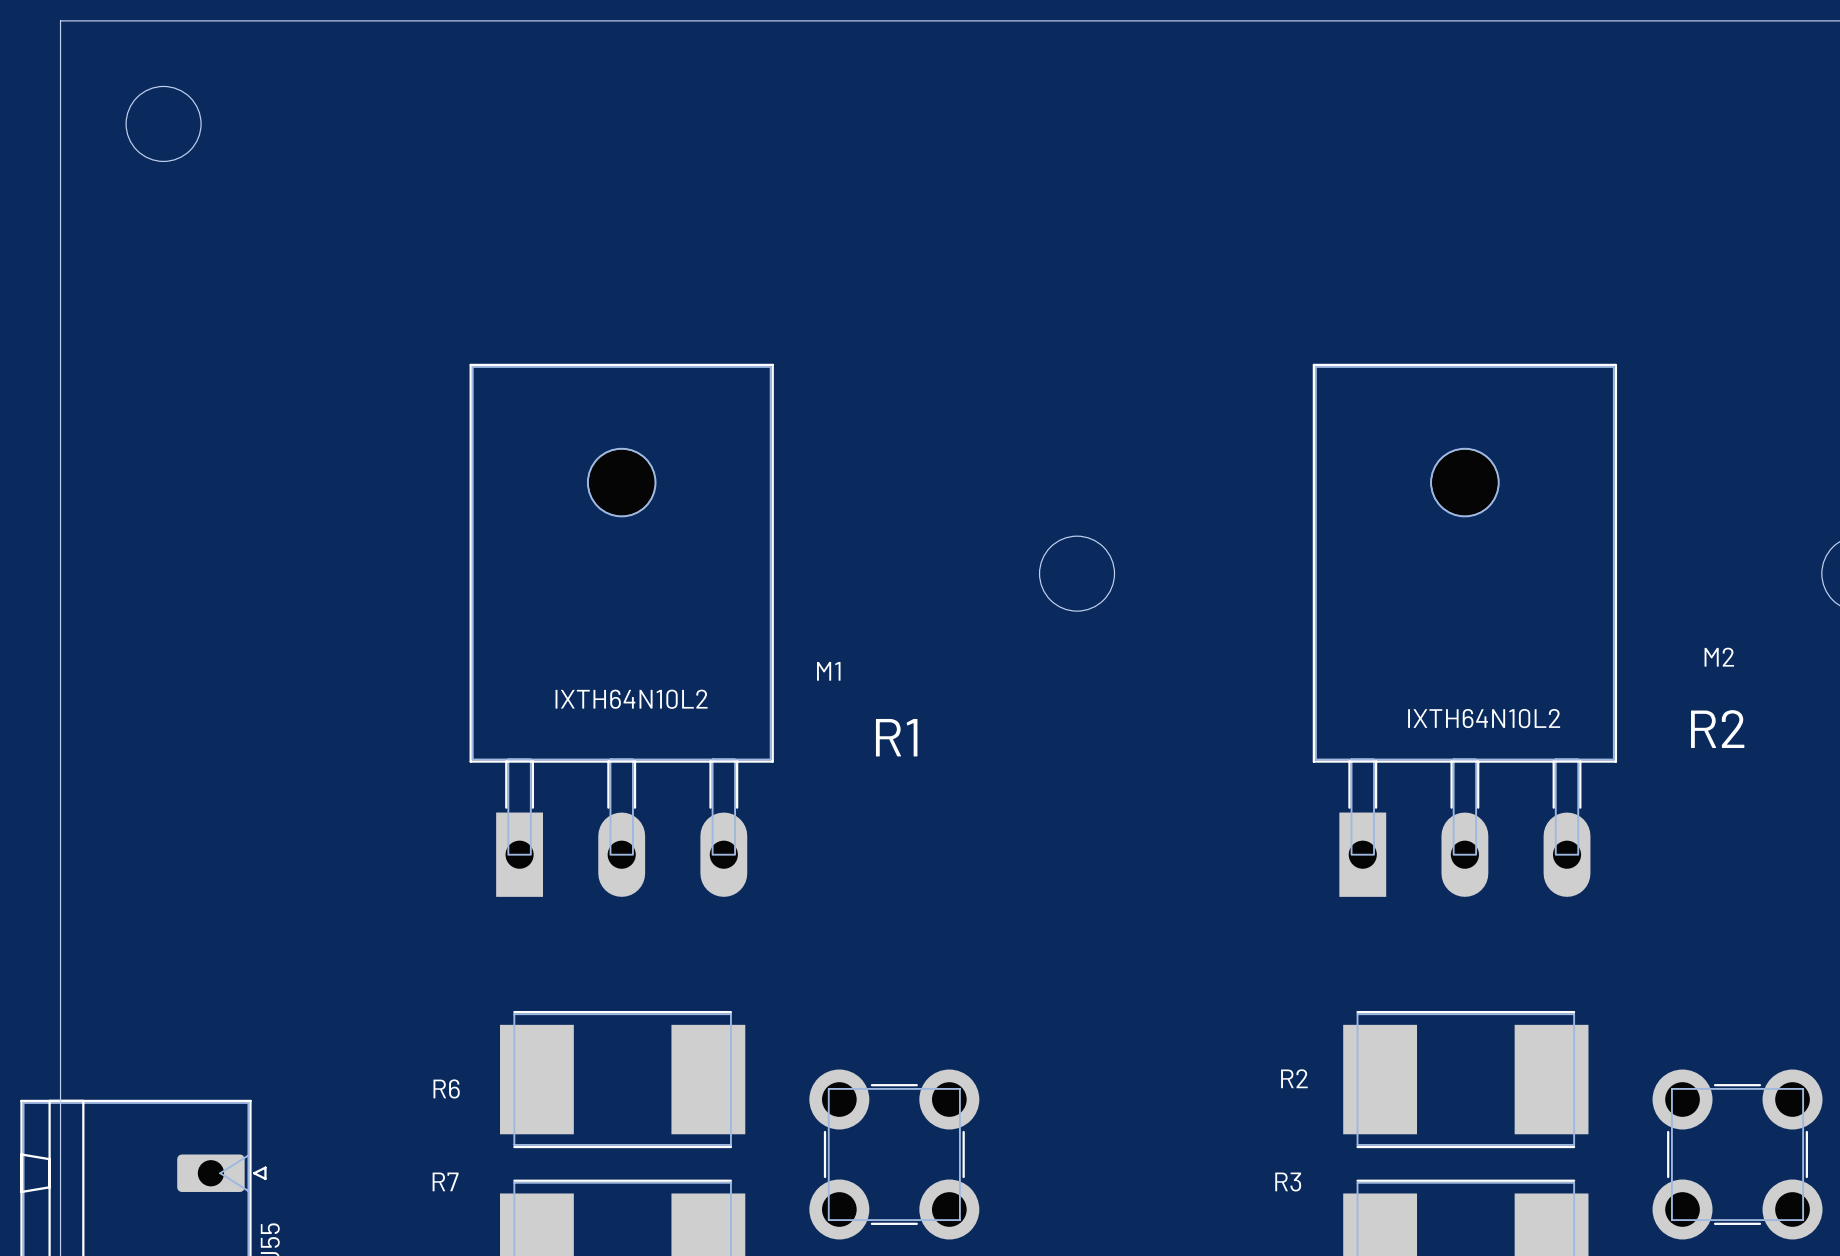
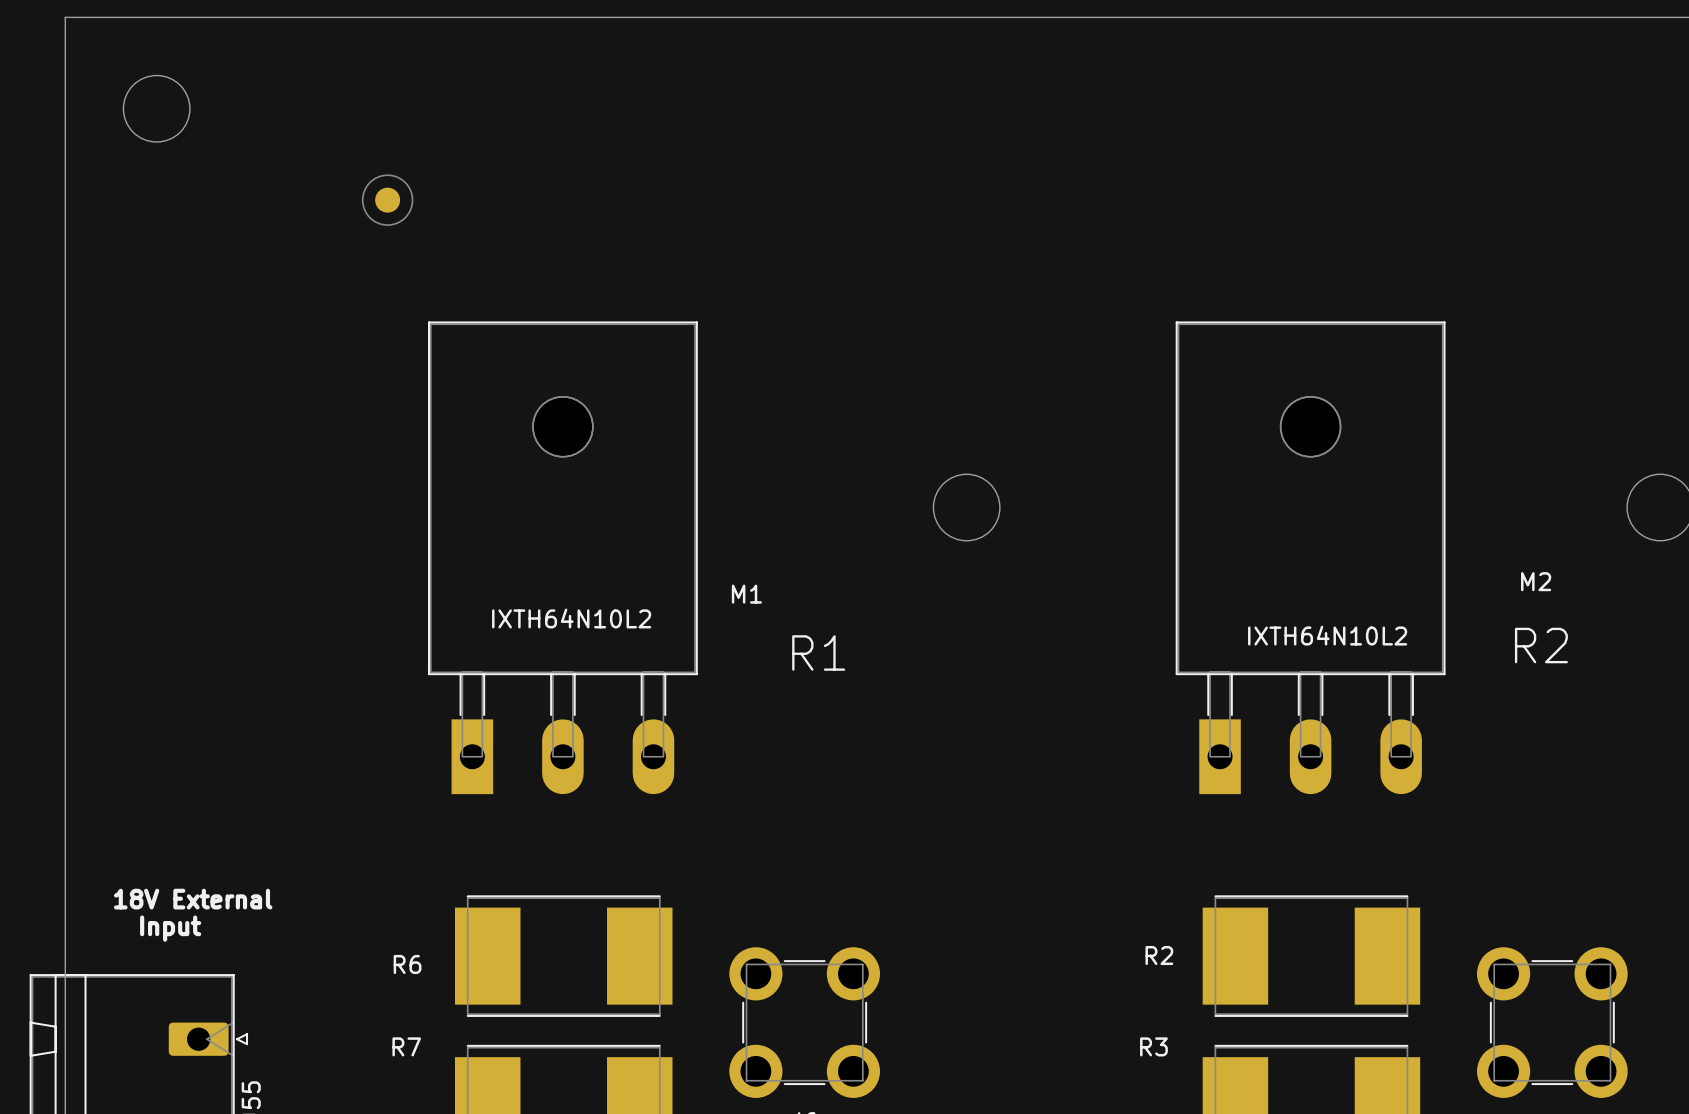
part: none -> (387, 200)
text: none -> 18V External (193, 899)
text: none -> Input (170, 928)

